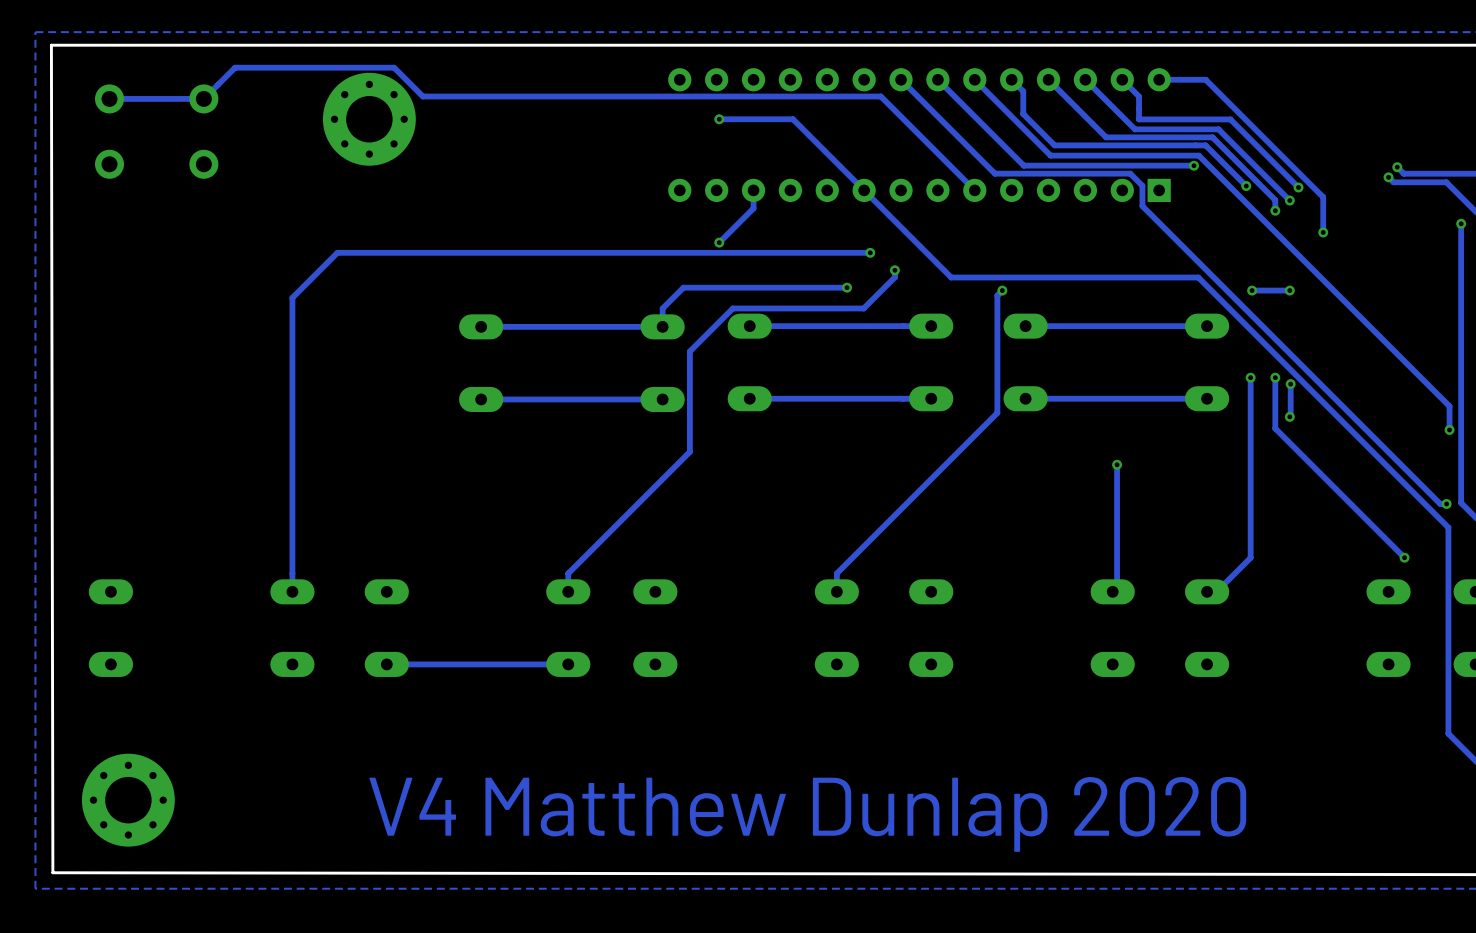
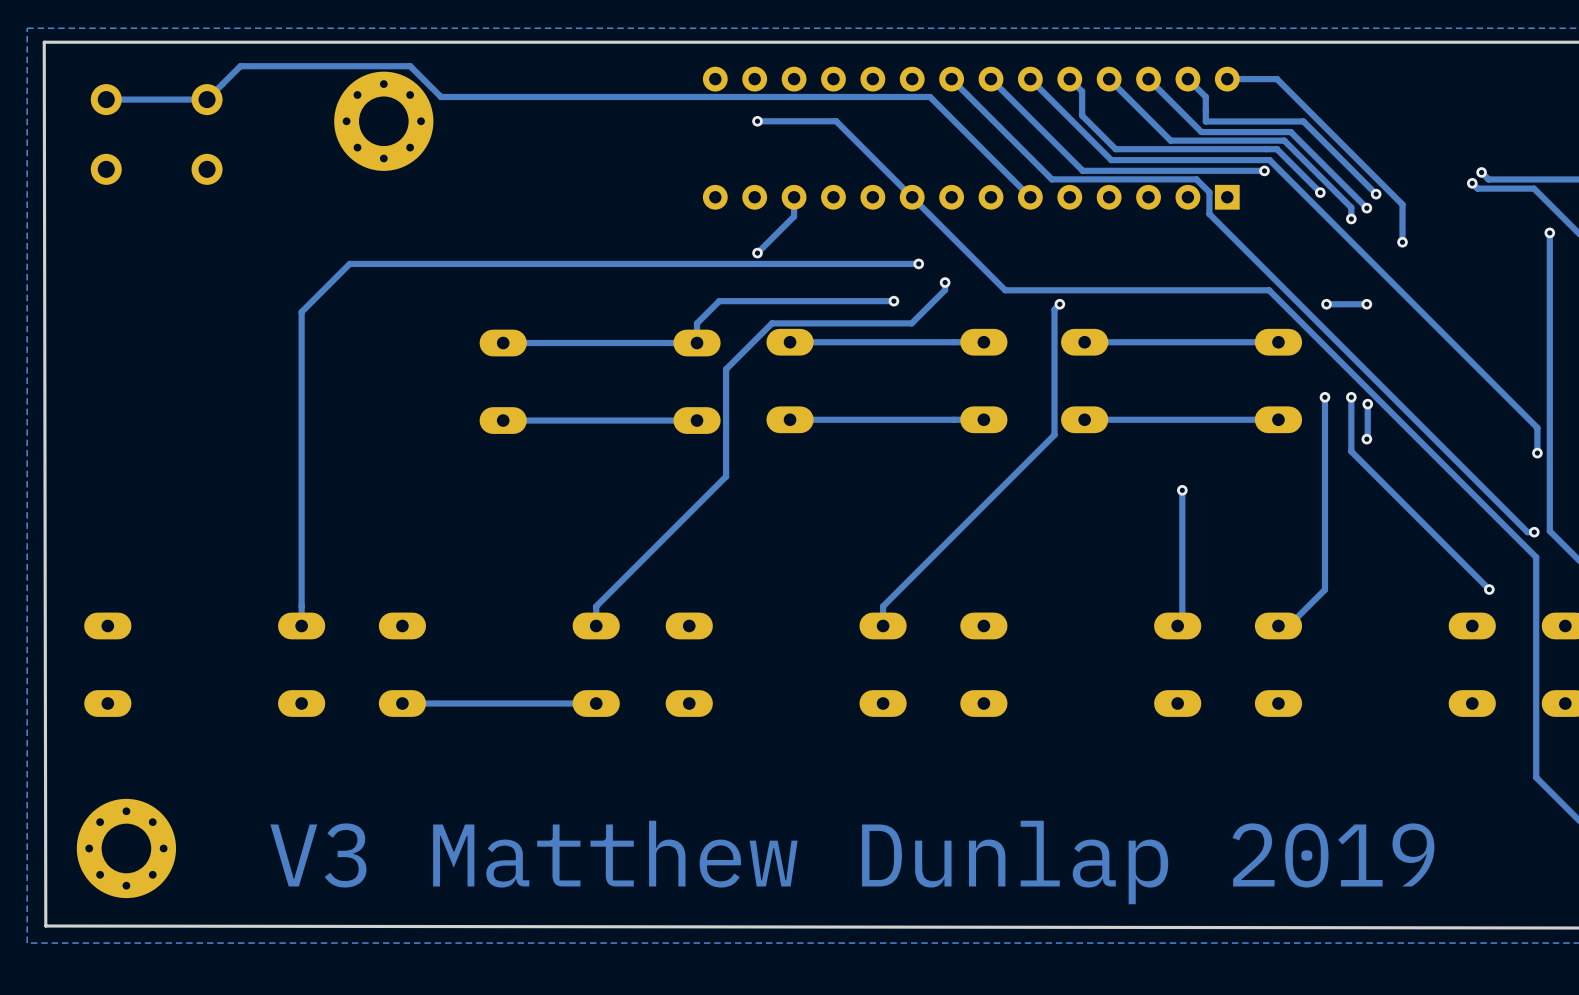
text: V4 Matthew Dunlap 2020 (807, 814) -> V3 Matthew Dunlap 2019 (852, 862)

